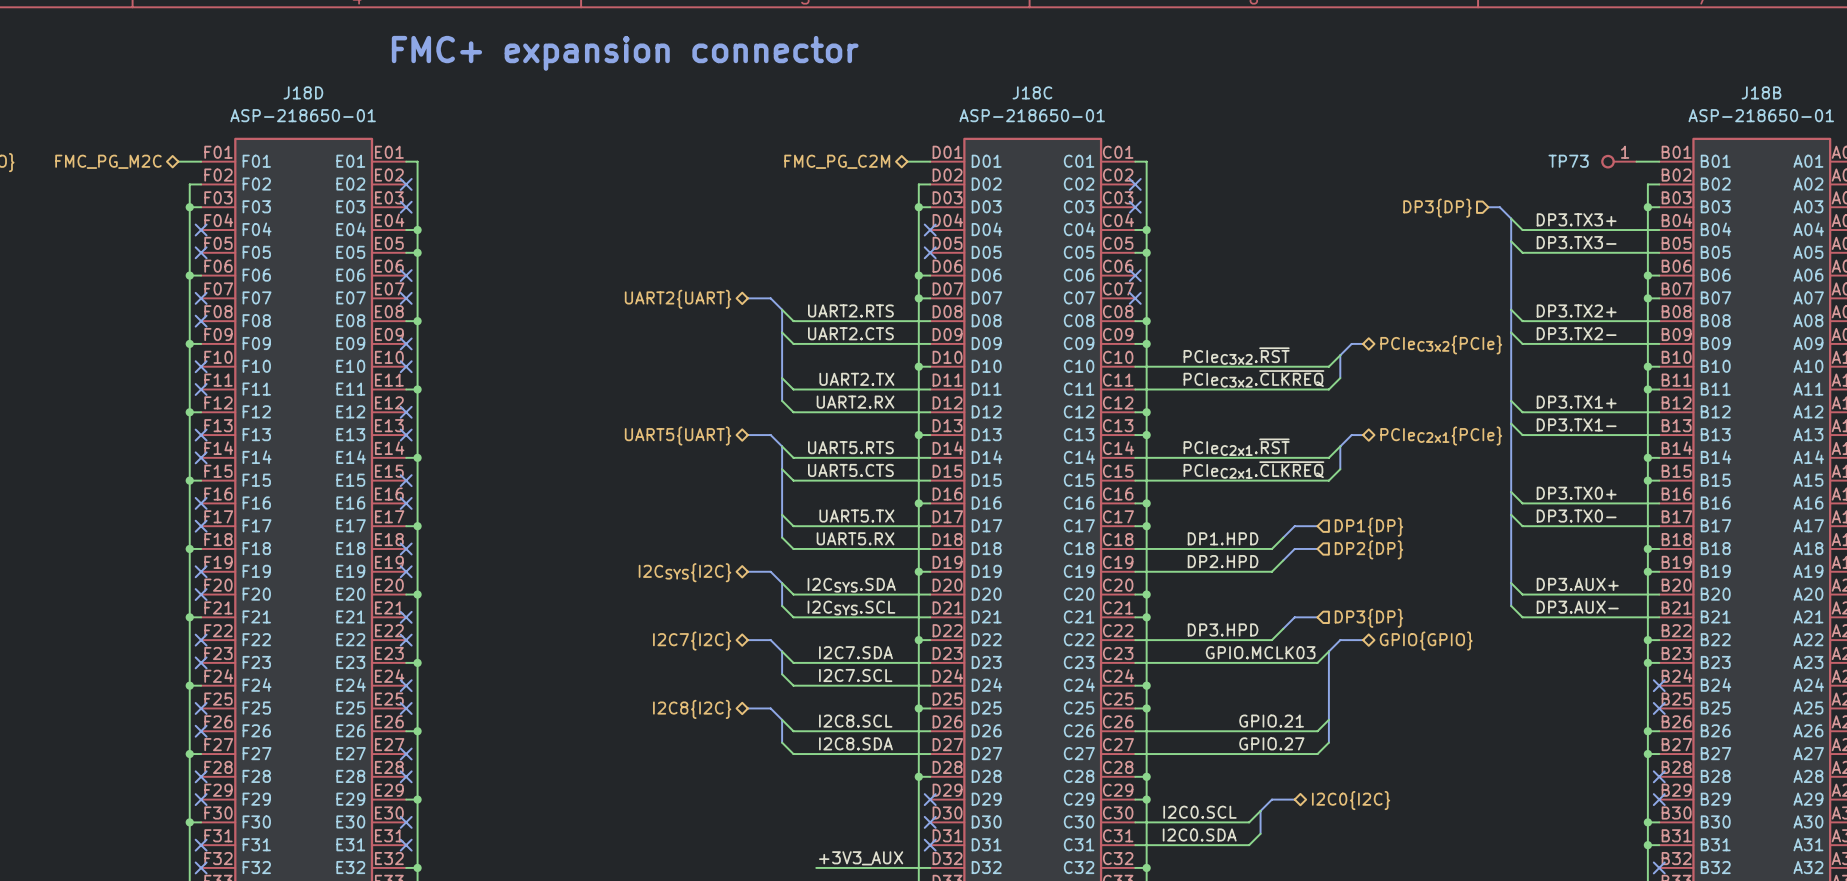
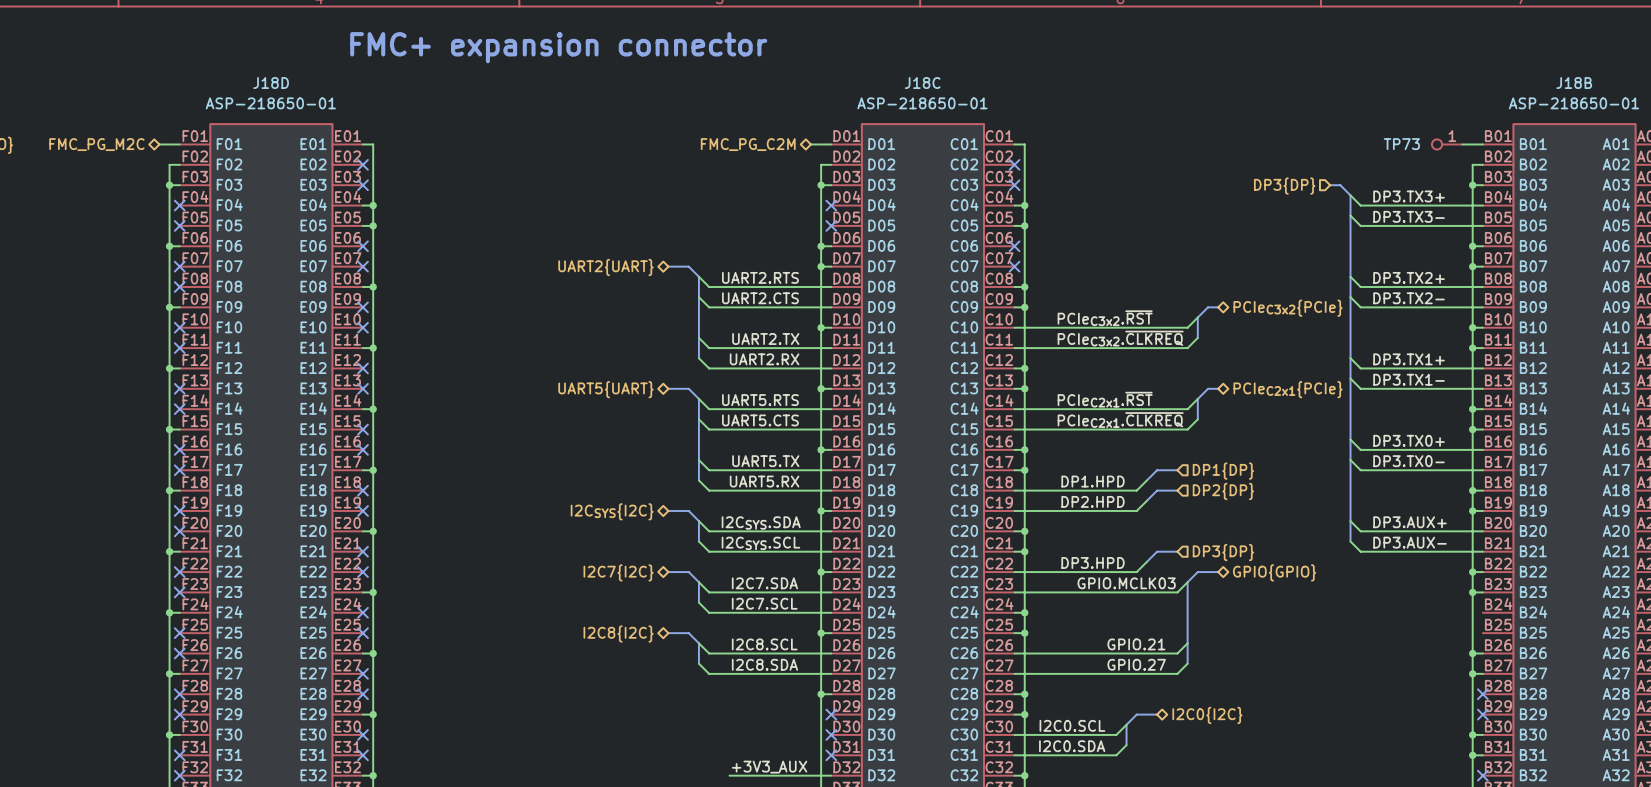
no-connect mark: (1659, 685) -> none
no-connect mark: (1659, 708) -> none

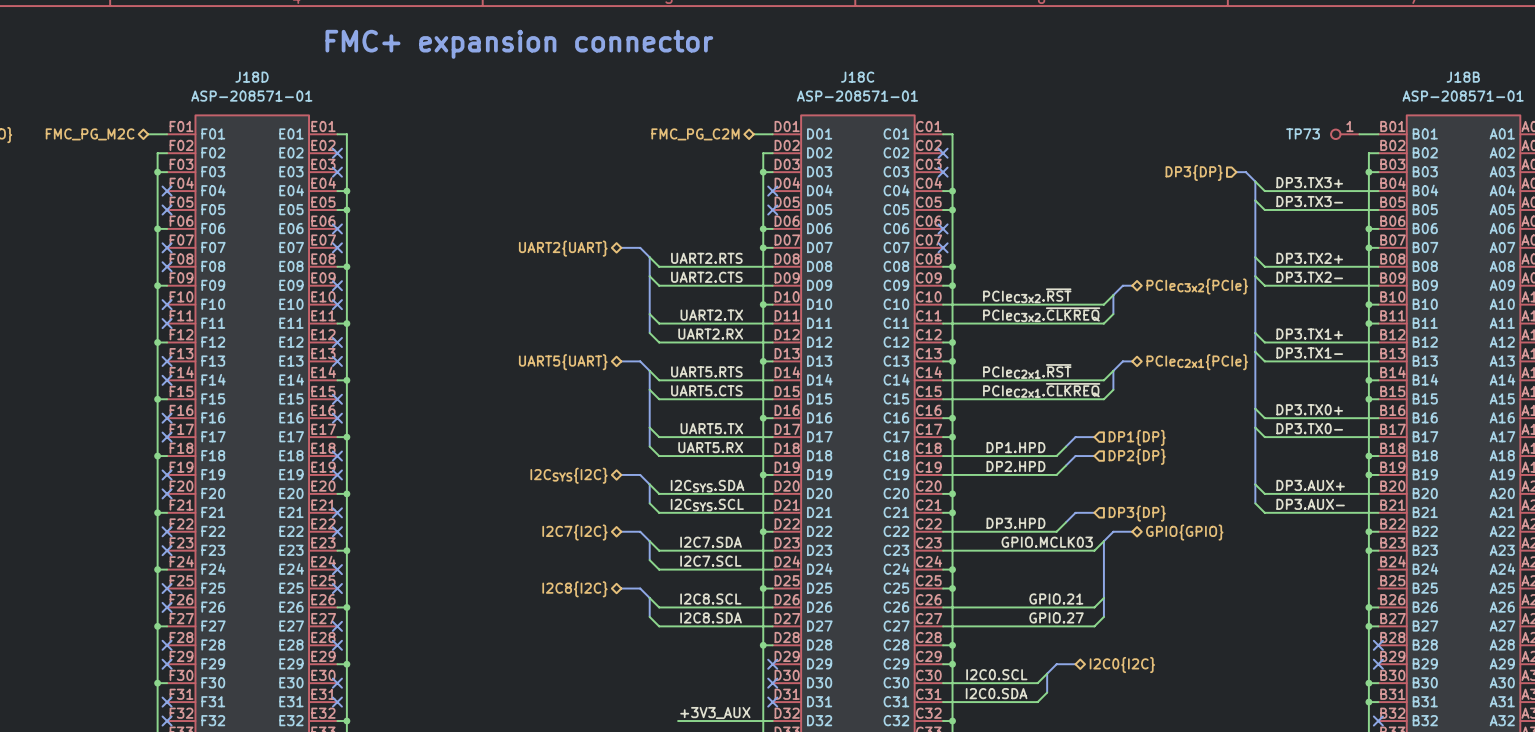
J18D text: ASP-218650-01 (270, 103) -> ASP-208571-01 (251, 96)
J18C text: ASP-218650-01 (922, 103) -> ASP-208571-01 (857, 96)
J18B text: ASP-218650-01 (1574, 103) -> ASP-208571-01 (1463, 96)

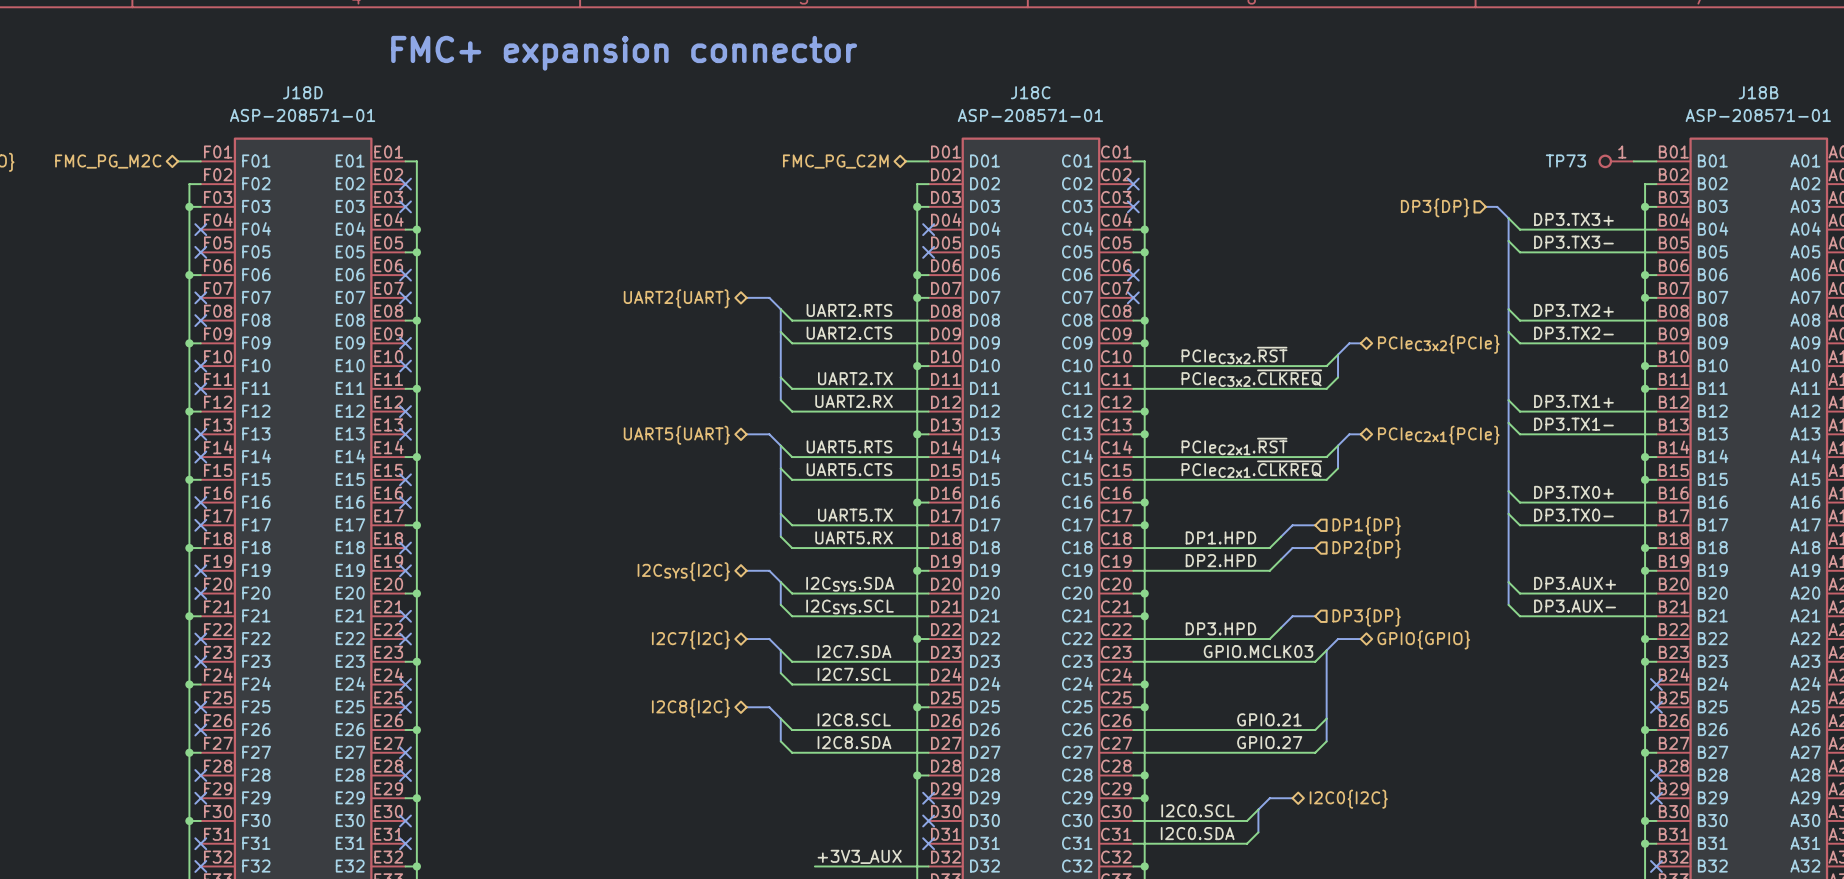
no-connect mark: none -> (1656, 684)
no-connect mark: none -> (1656, 707)

